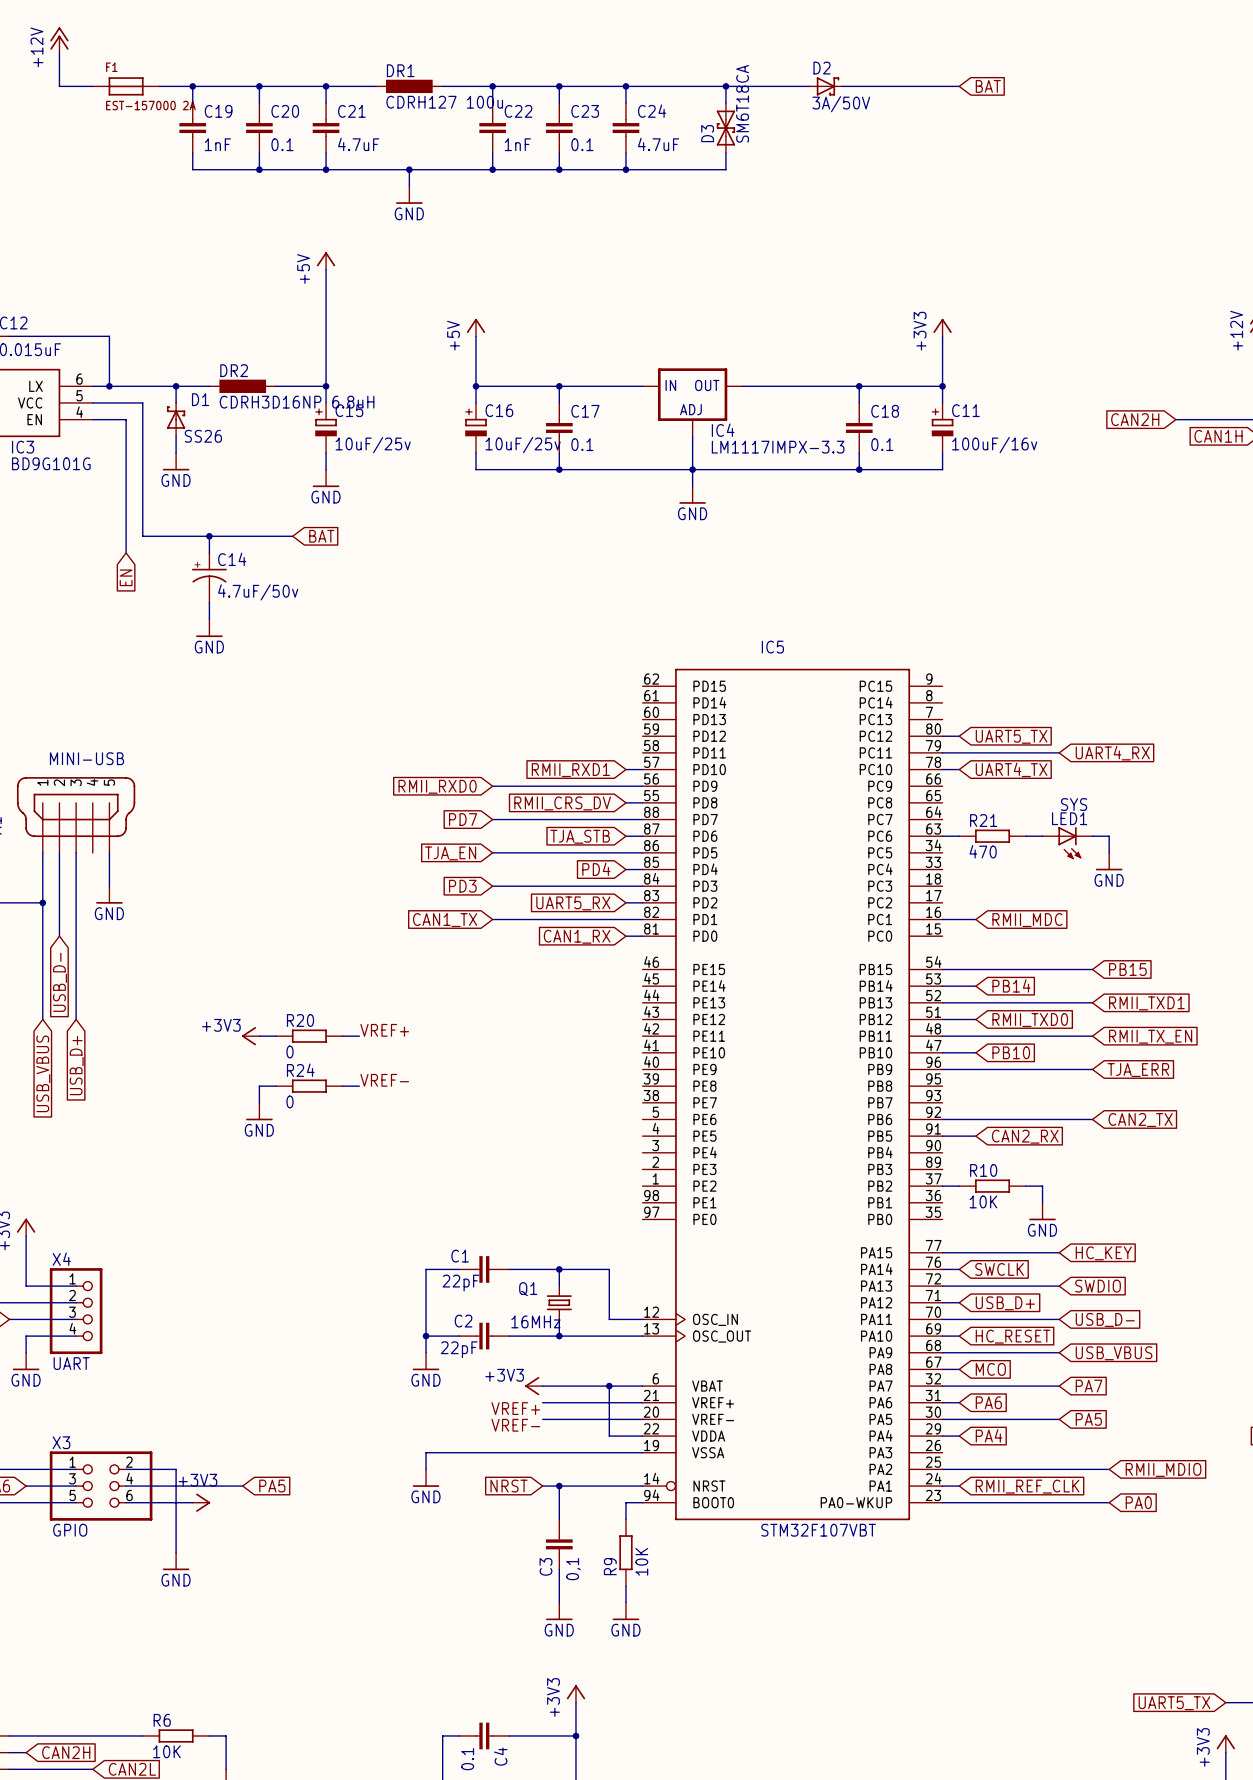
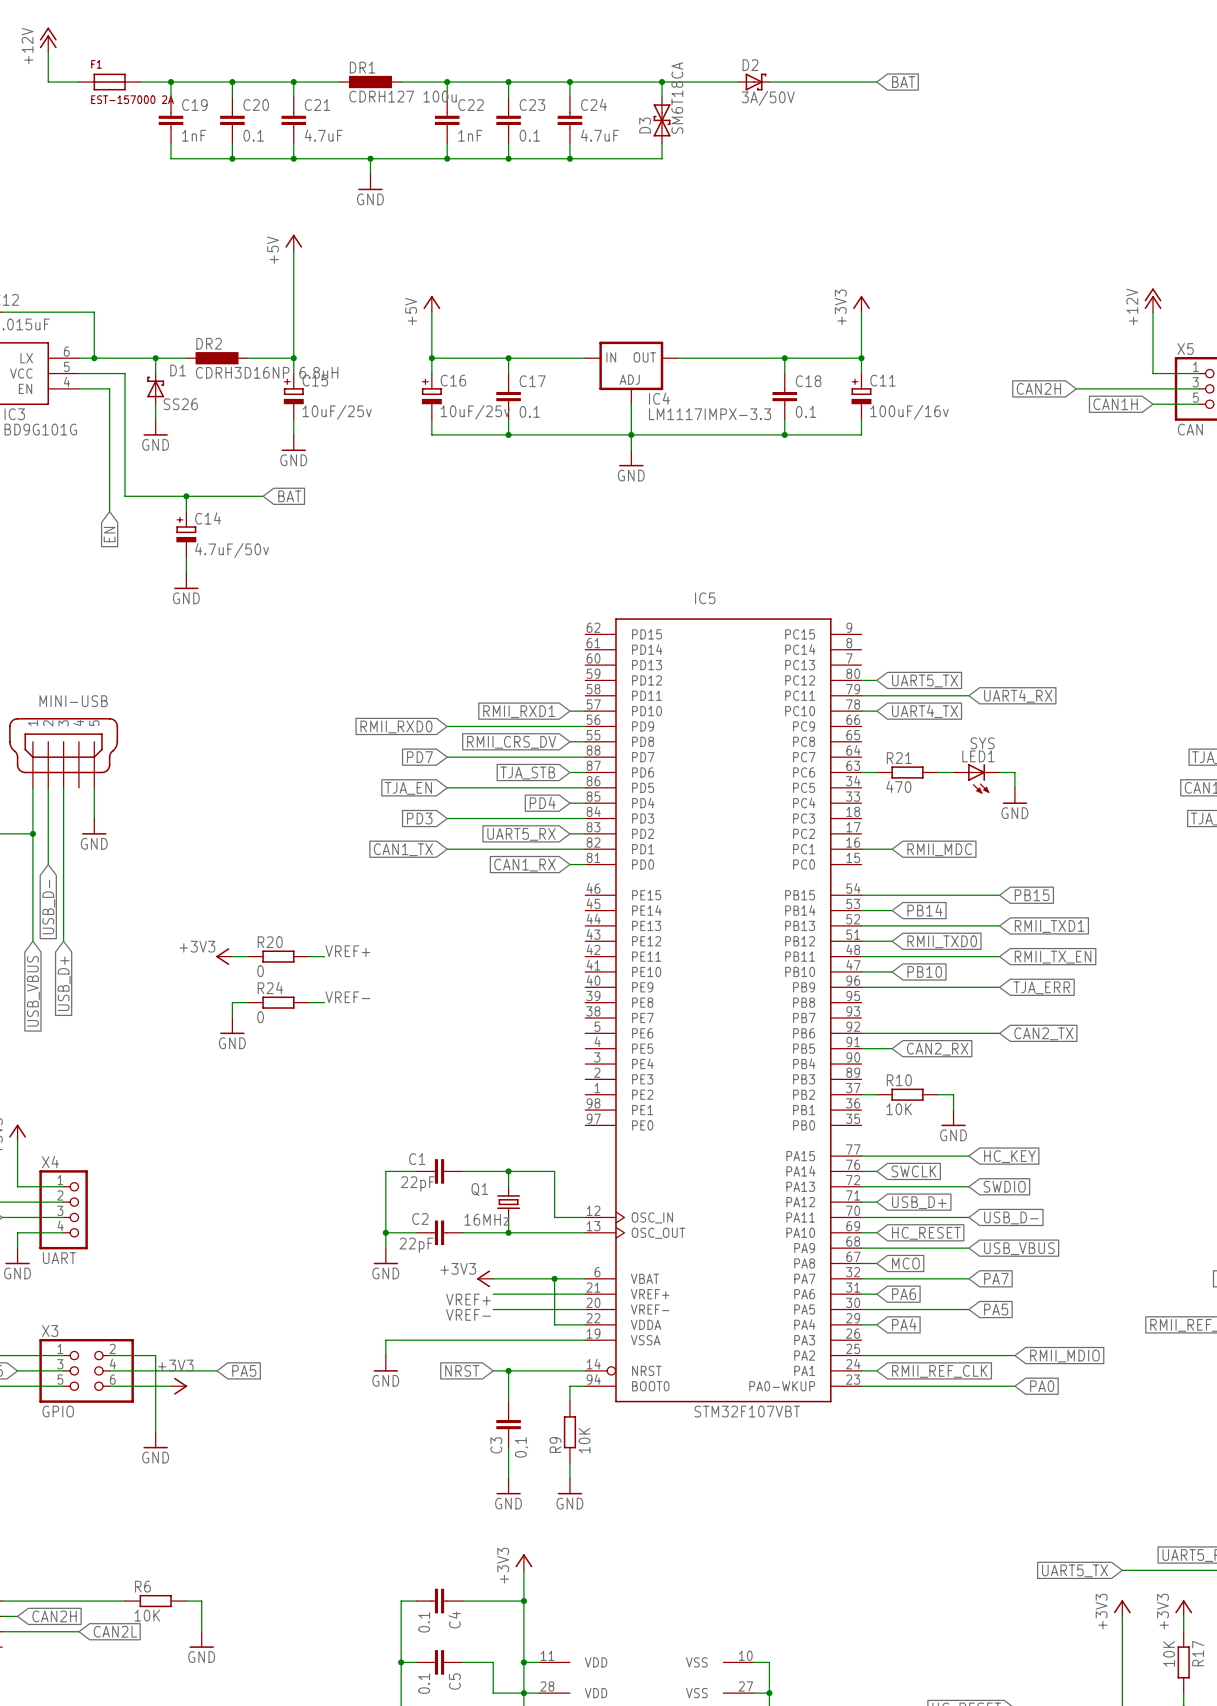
C14 symbol: [191, 552, 227, 603] -> [176, 511, 197, 558]

